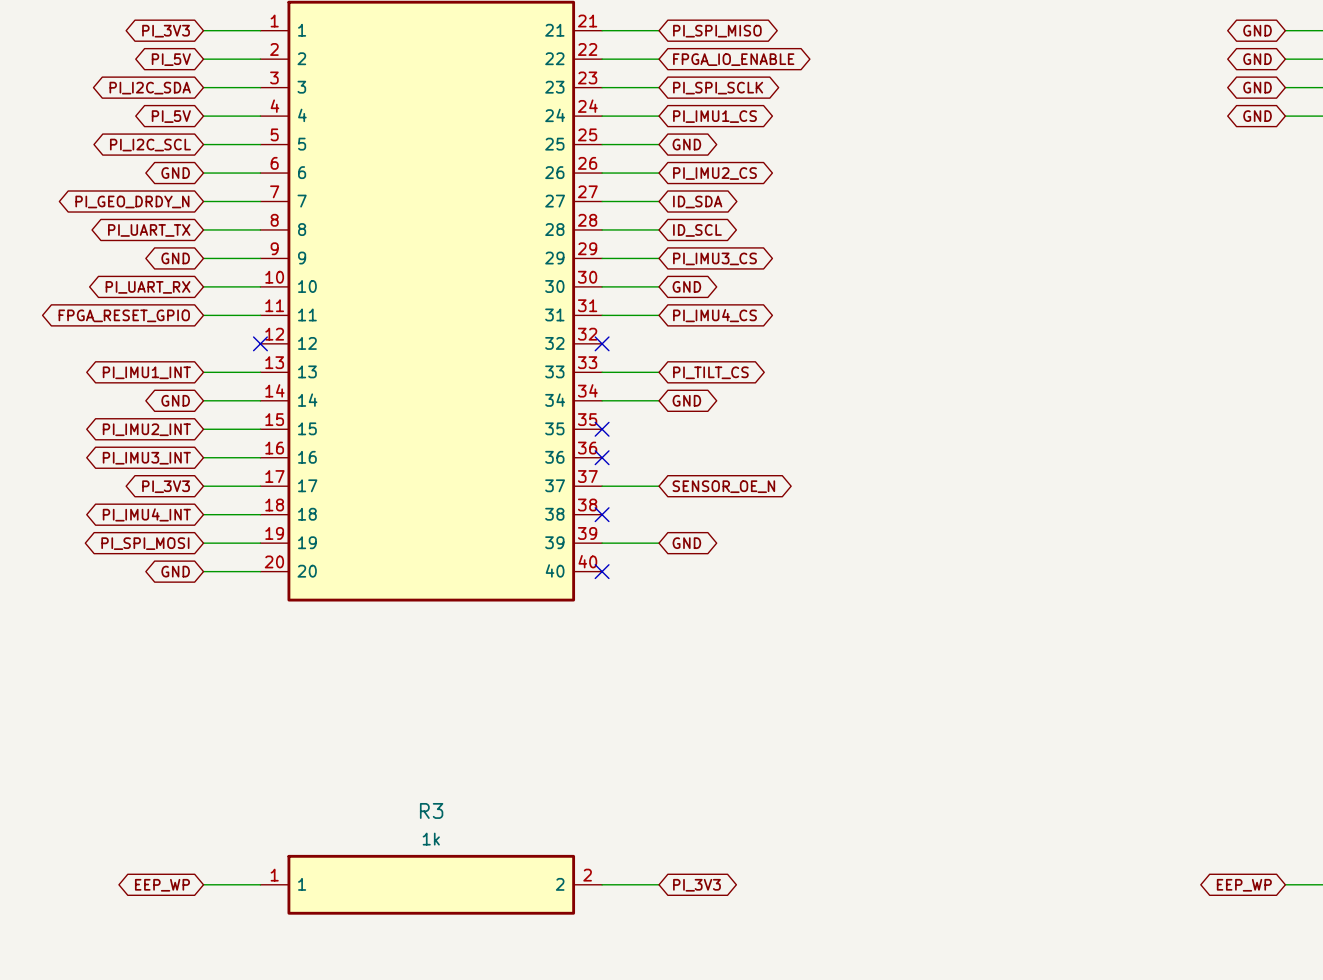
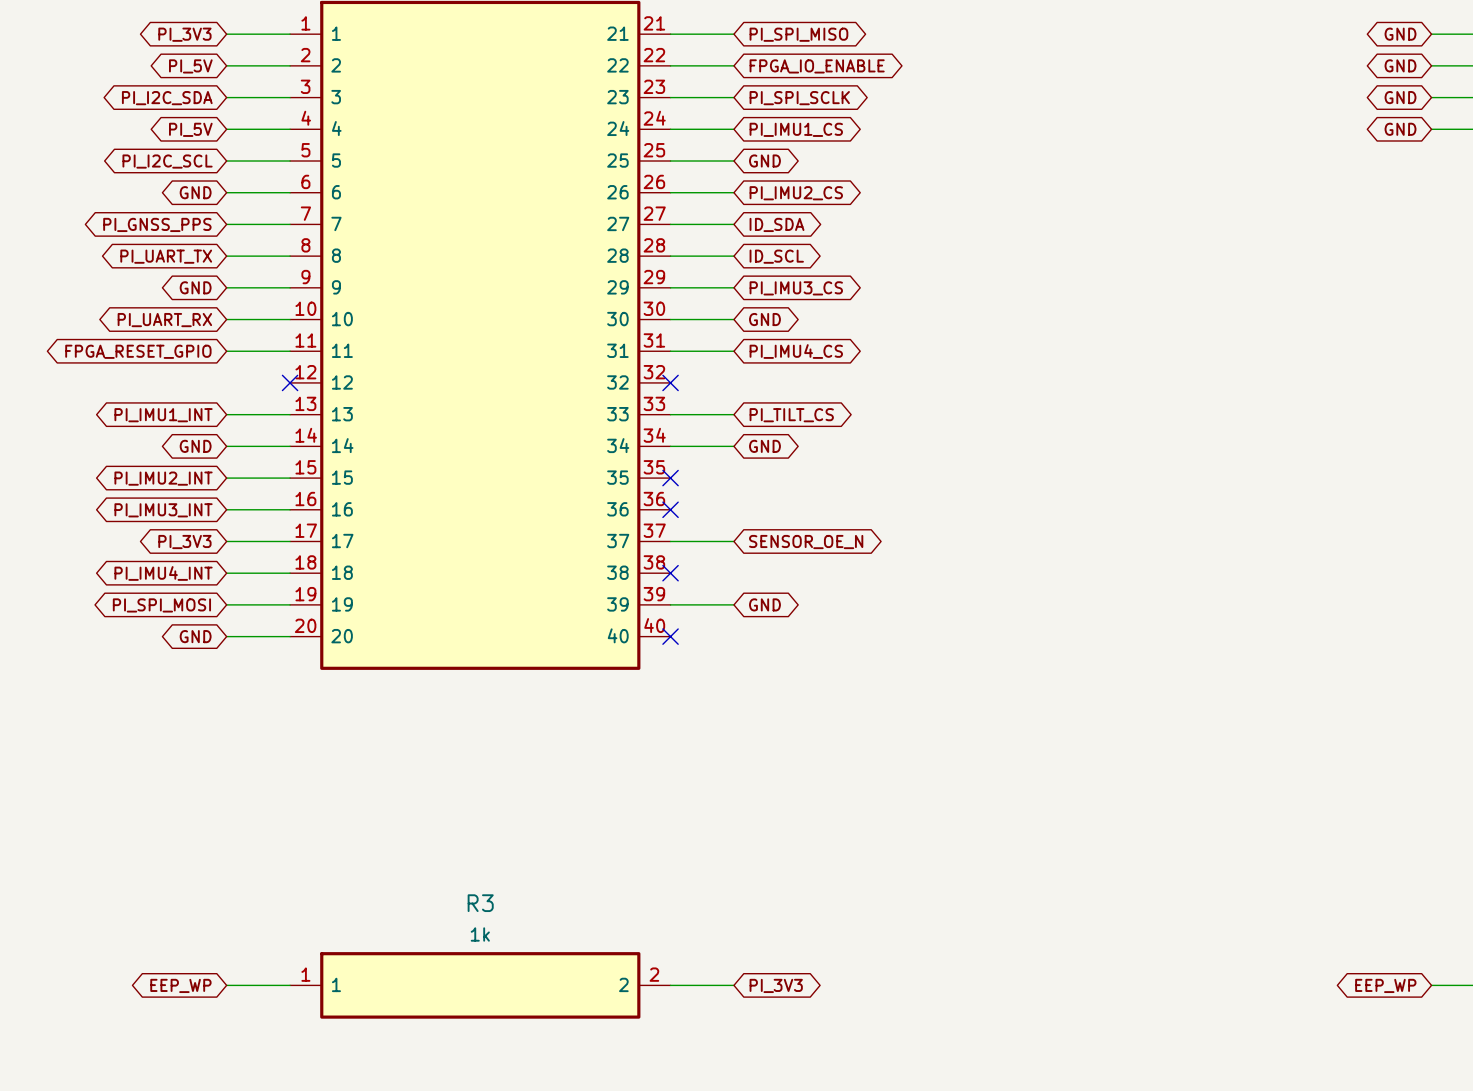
global label: PI_GEO_DRDY_N (132, 201) -> PI_GNSS_PPS (157, 224)

